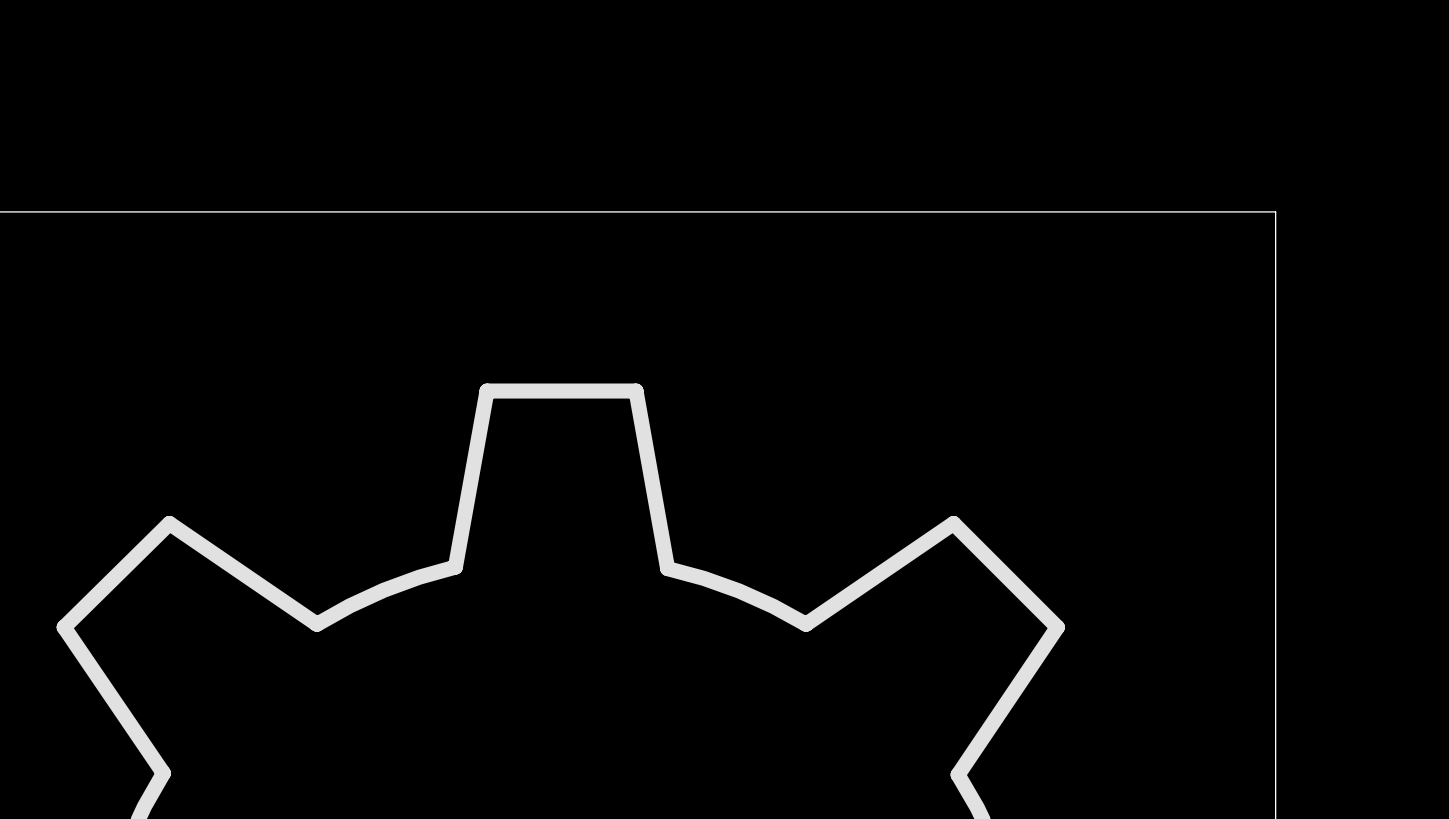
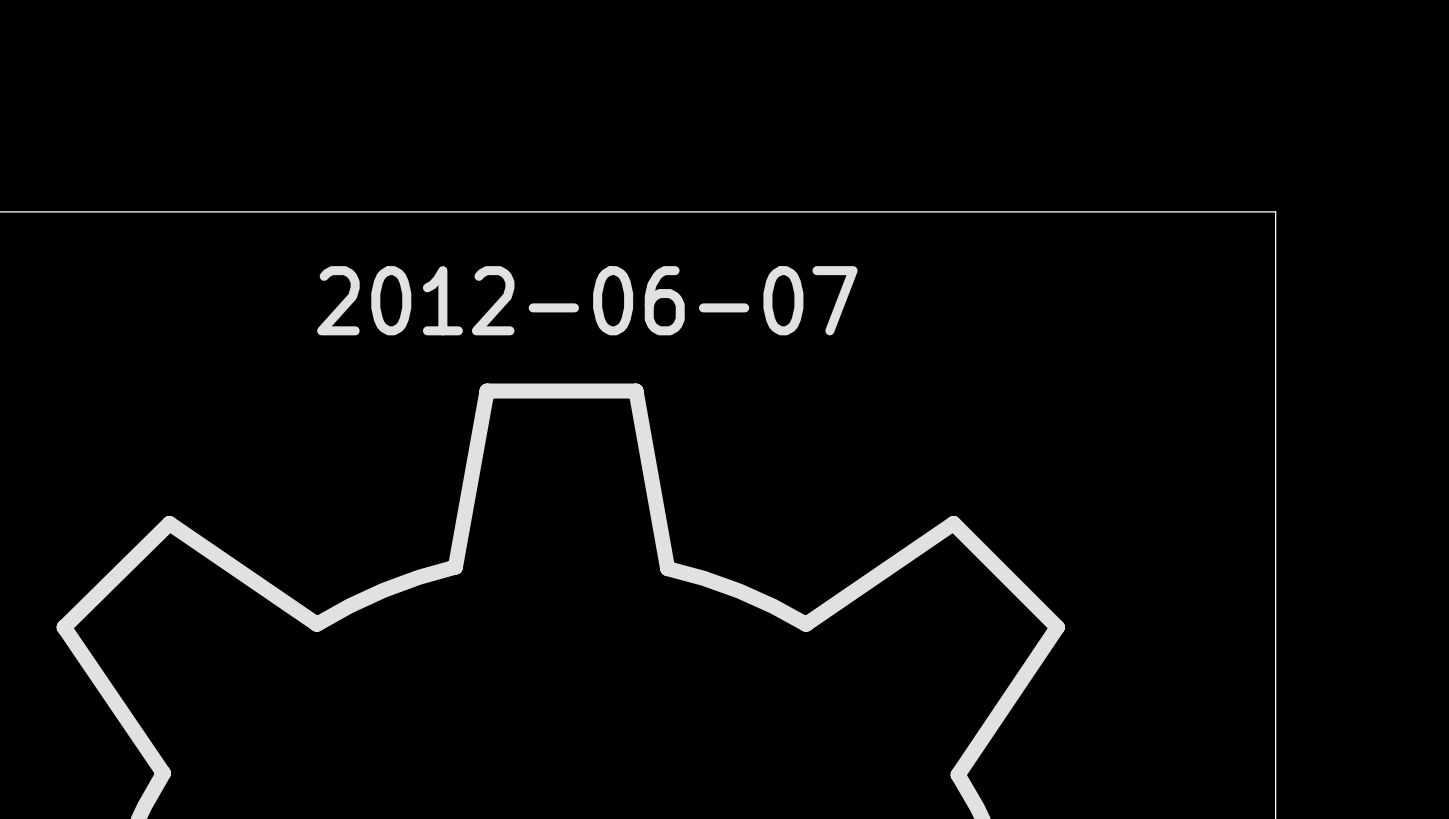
text: none -> 2012-06-07 (587, 300)

